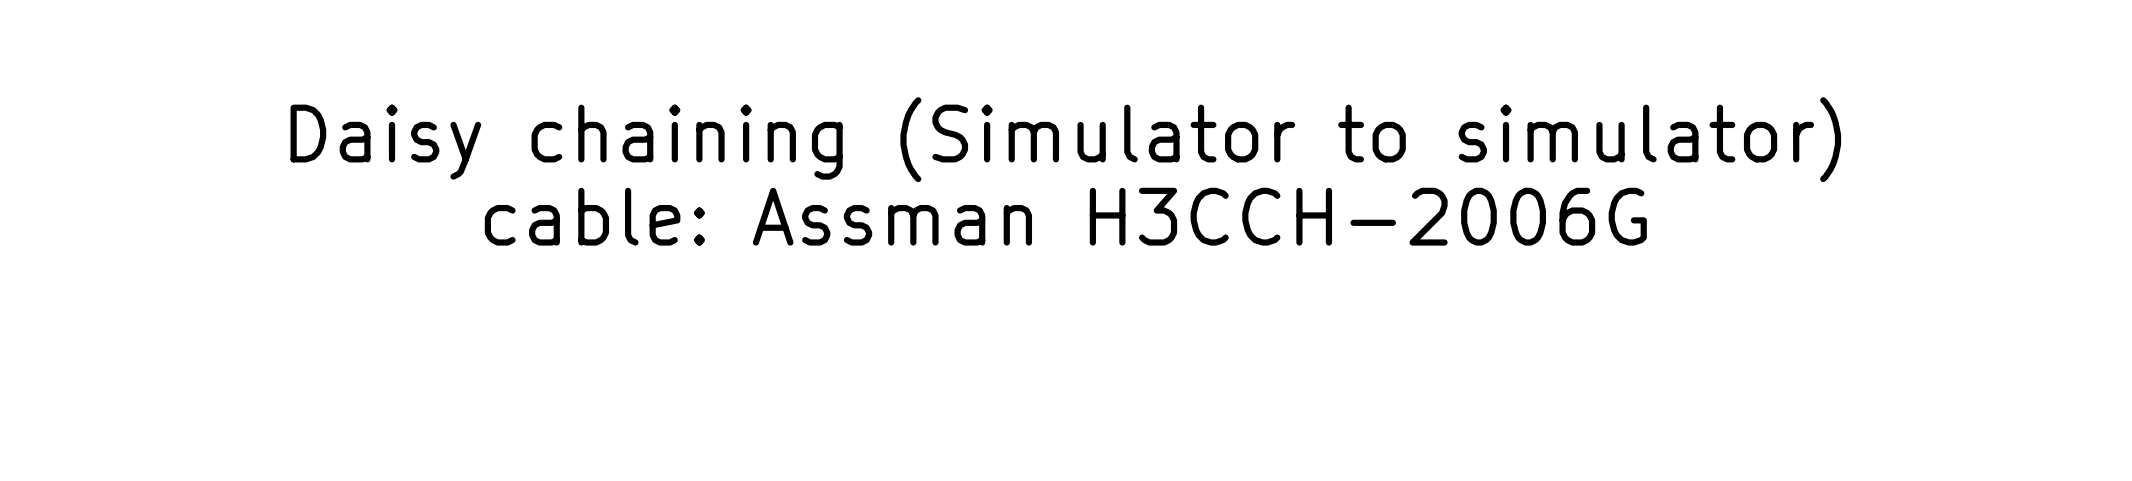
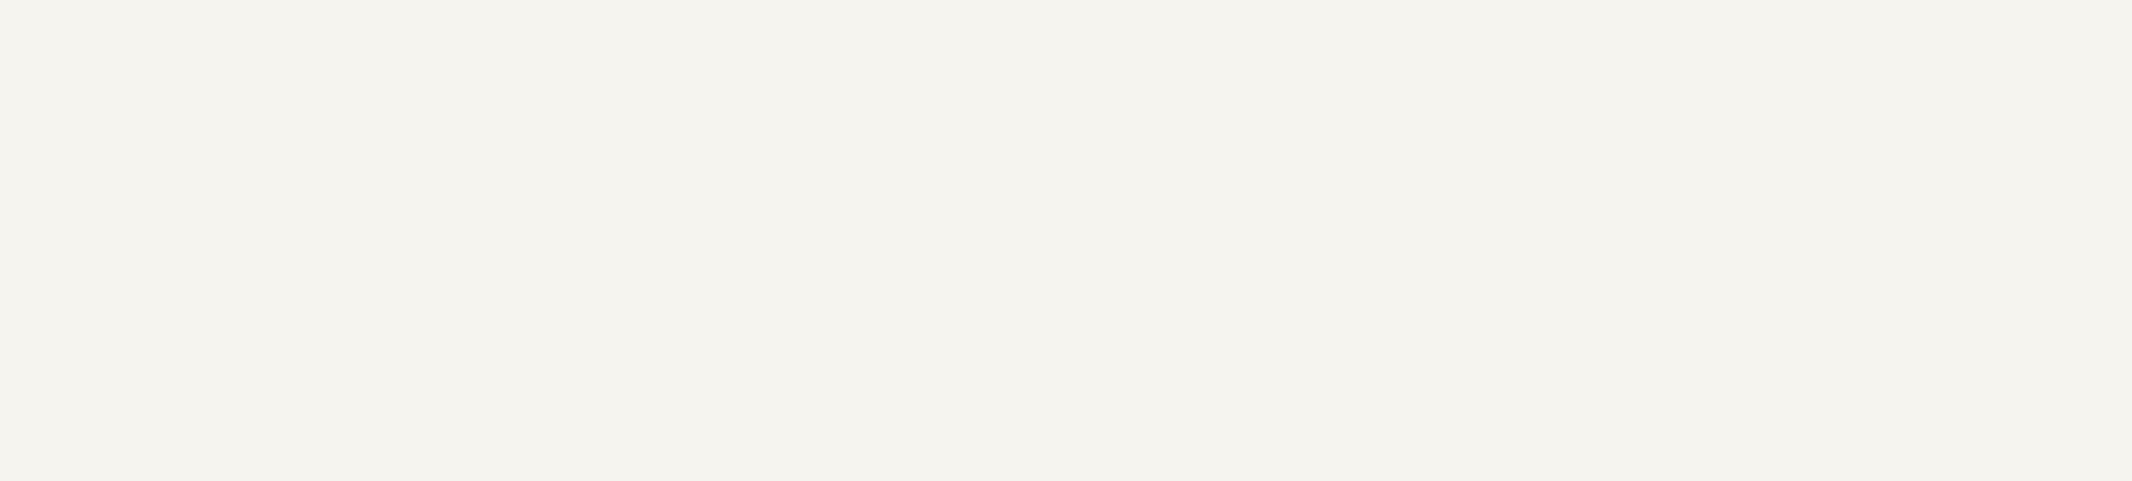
text: Daisy chaining (Simulator to simulator) (1065, 139) -> none
text: cable: Assman H3CCH-2006G (1065, 216) -> none

